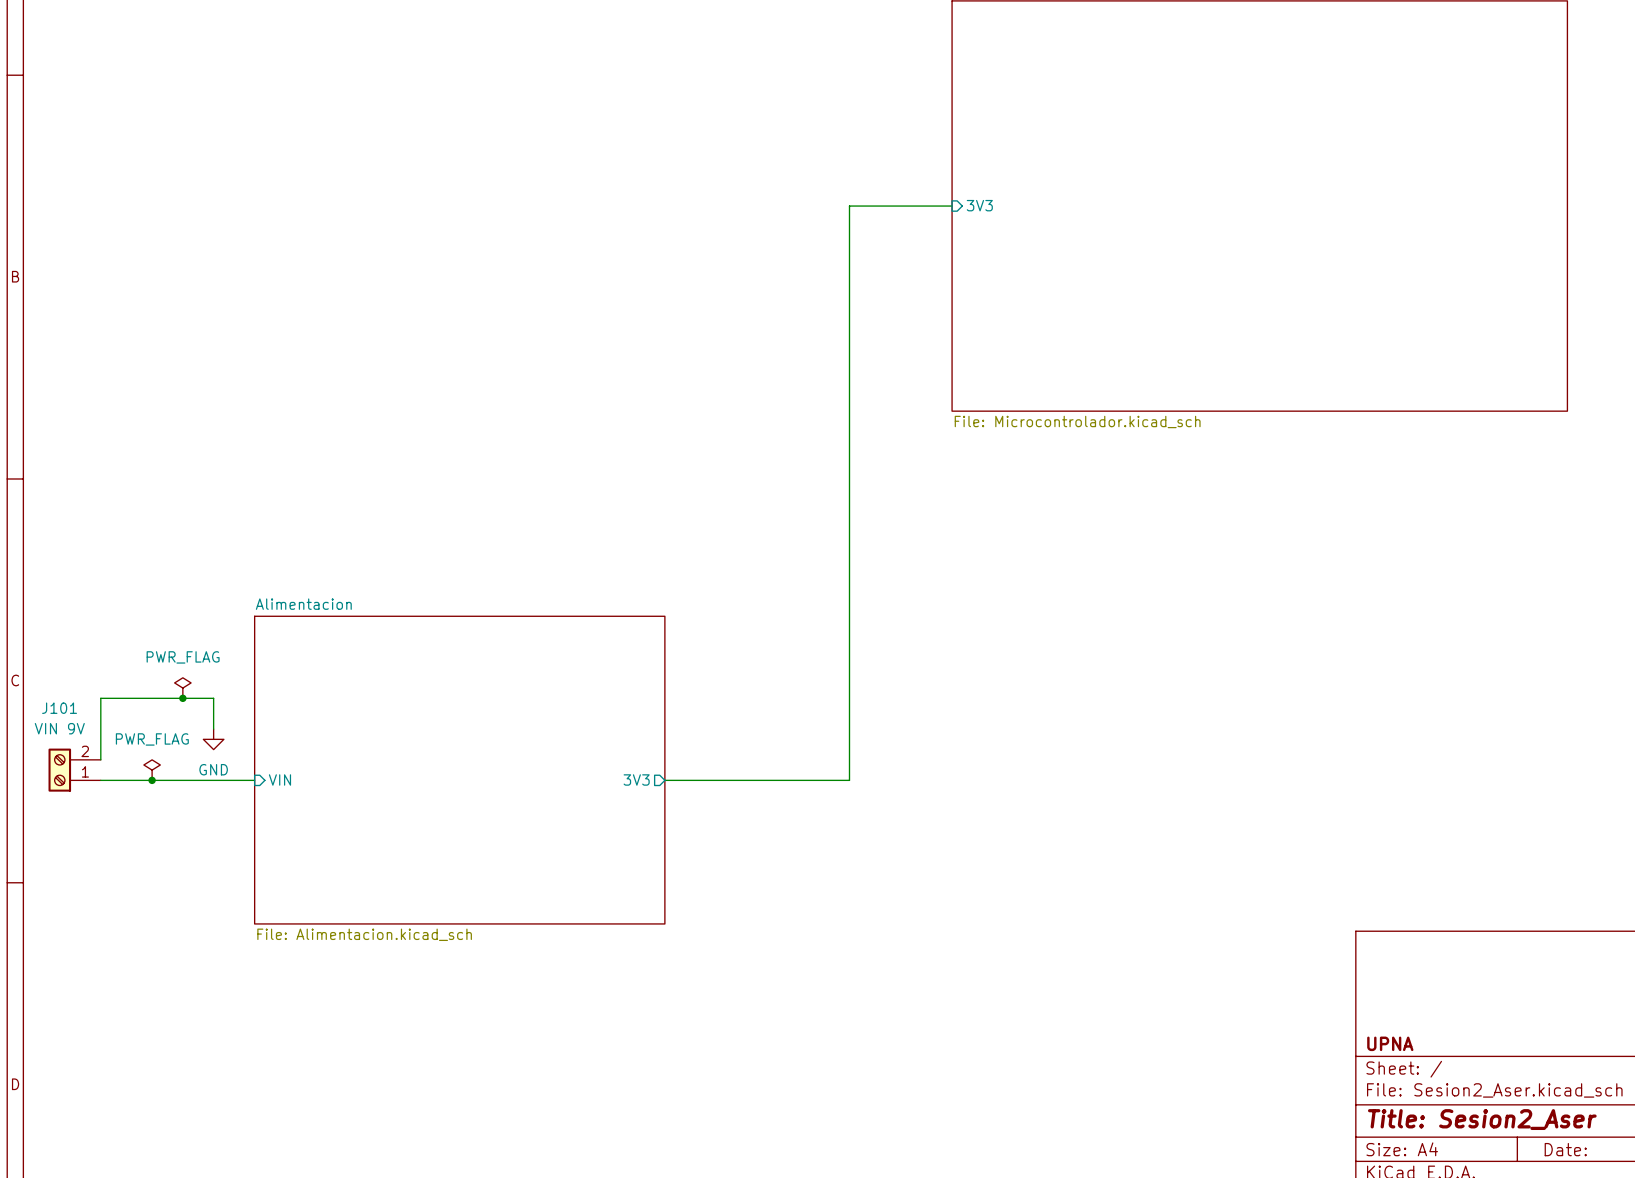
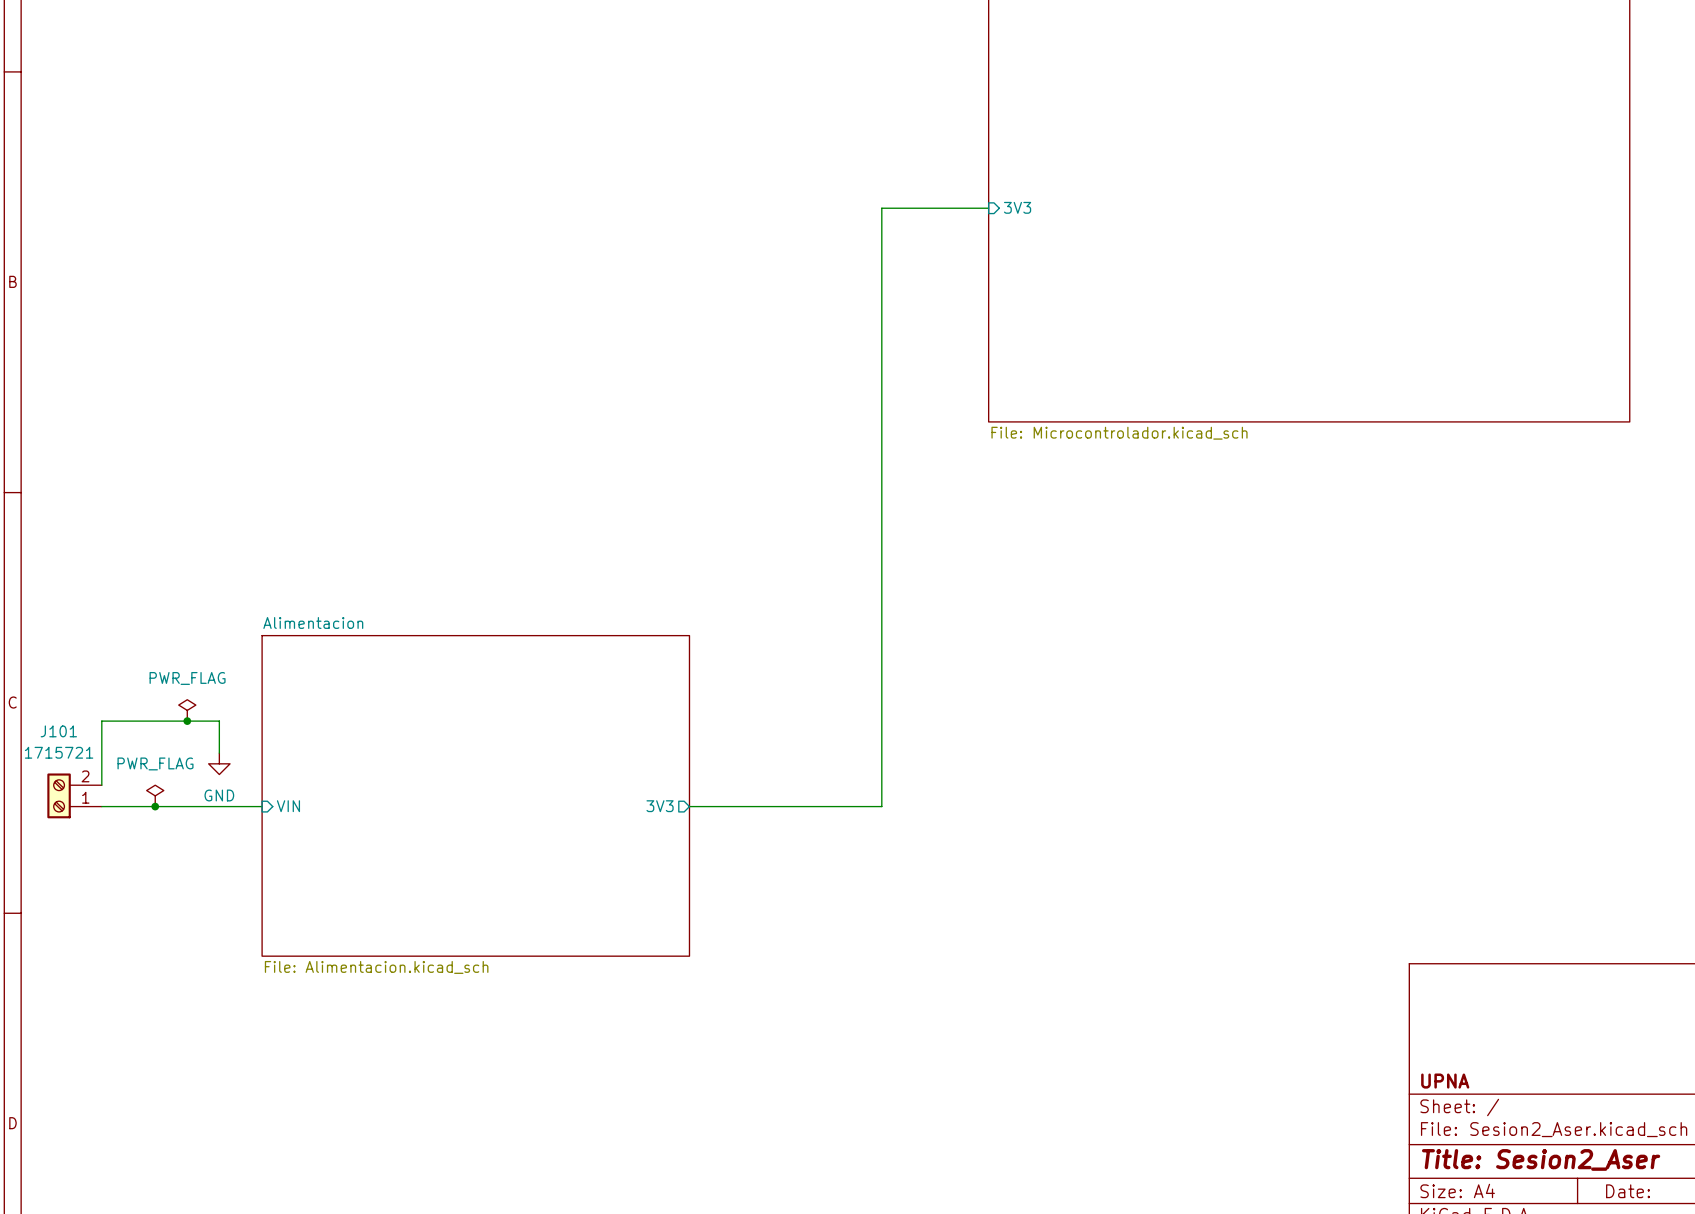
J101 value: VIN 9V (59, 728) -> 1715721 (59, 752)

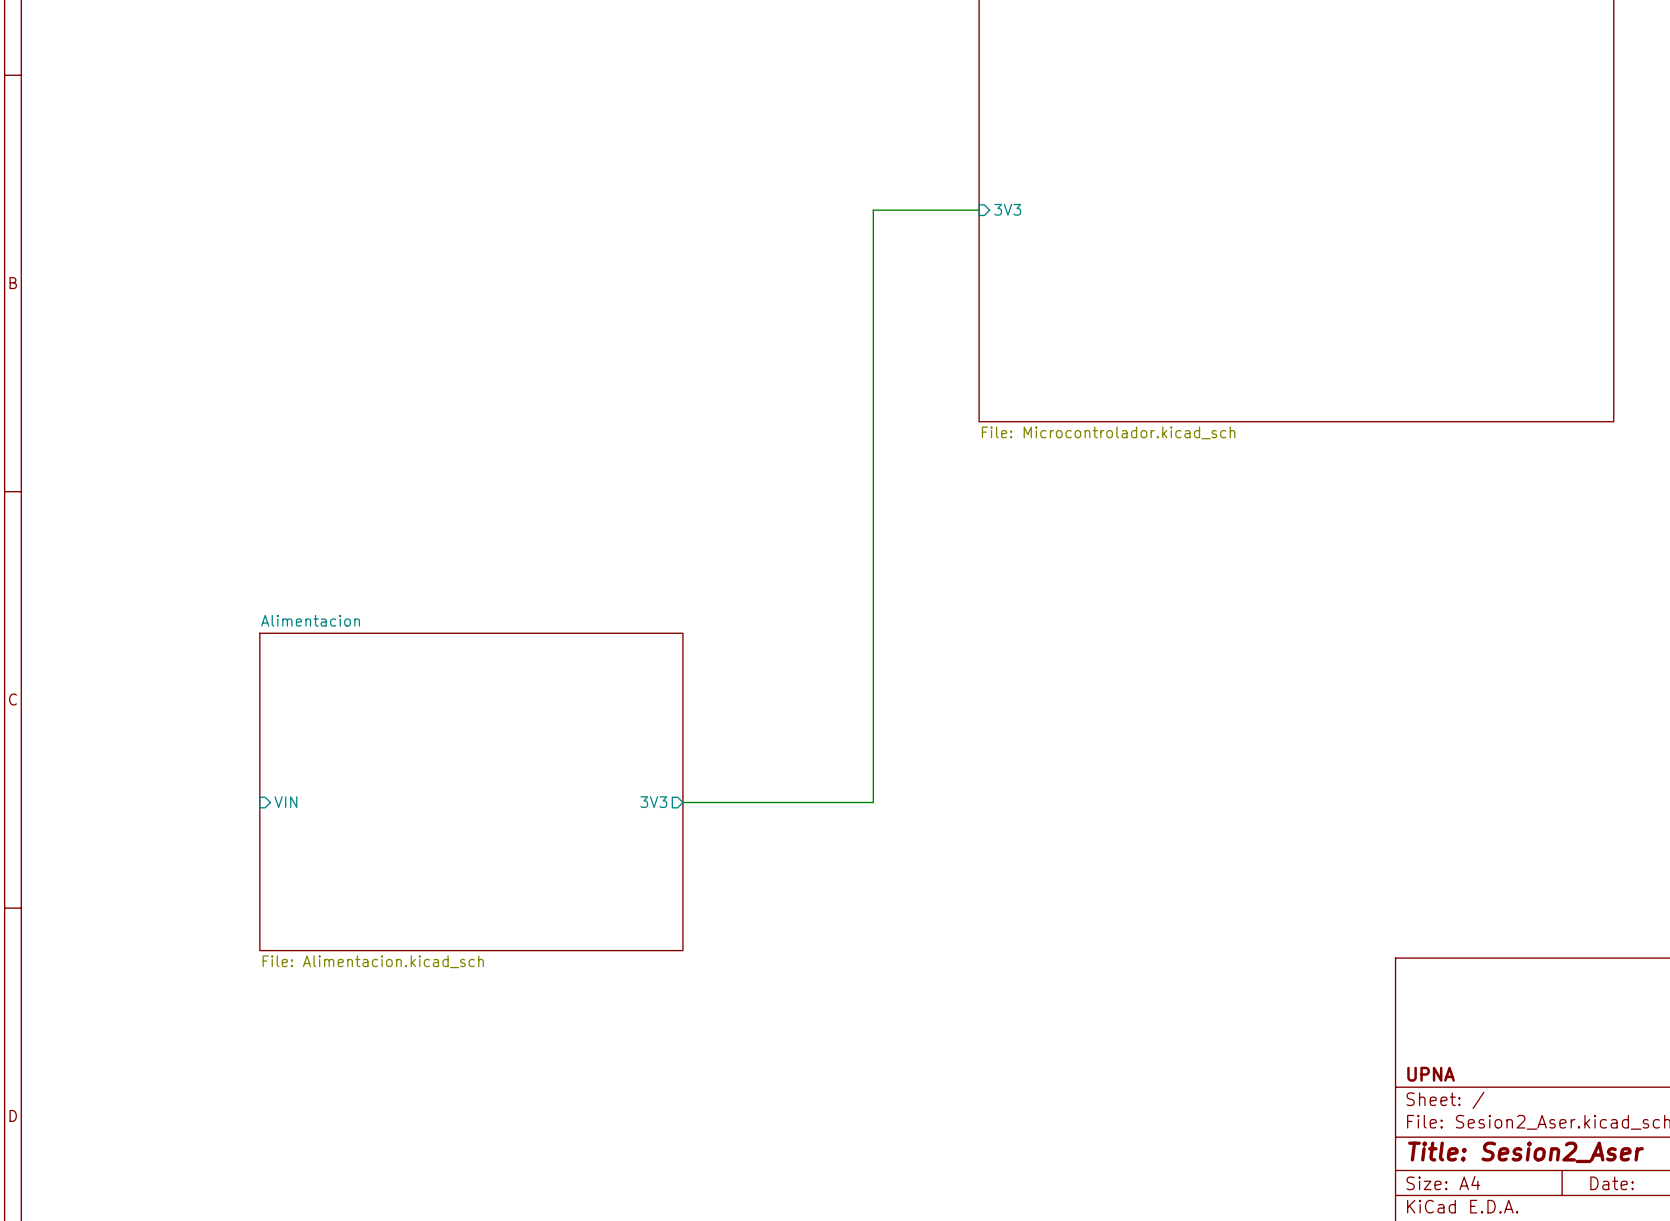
power symbol: PWR_FLAG (187, 710) -> none
junction: (187, 721) -> none
wire: (219, 753) (219, 721) (101, 721) (101, 785) -> none
power symbol: GND (219, 763) -> none
J101: 1715721 (74, 795) -> none
power symbol: PWR_FLAG (155, 795) -> none
wire: (101, 806) (262, 806) -> none
junction: (155, 806) -> none

